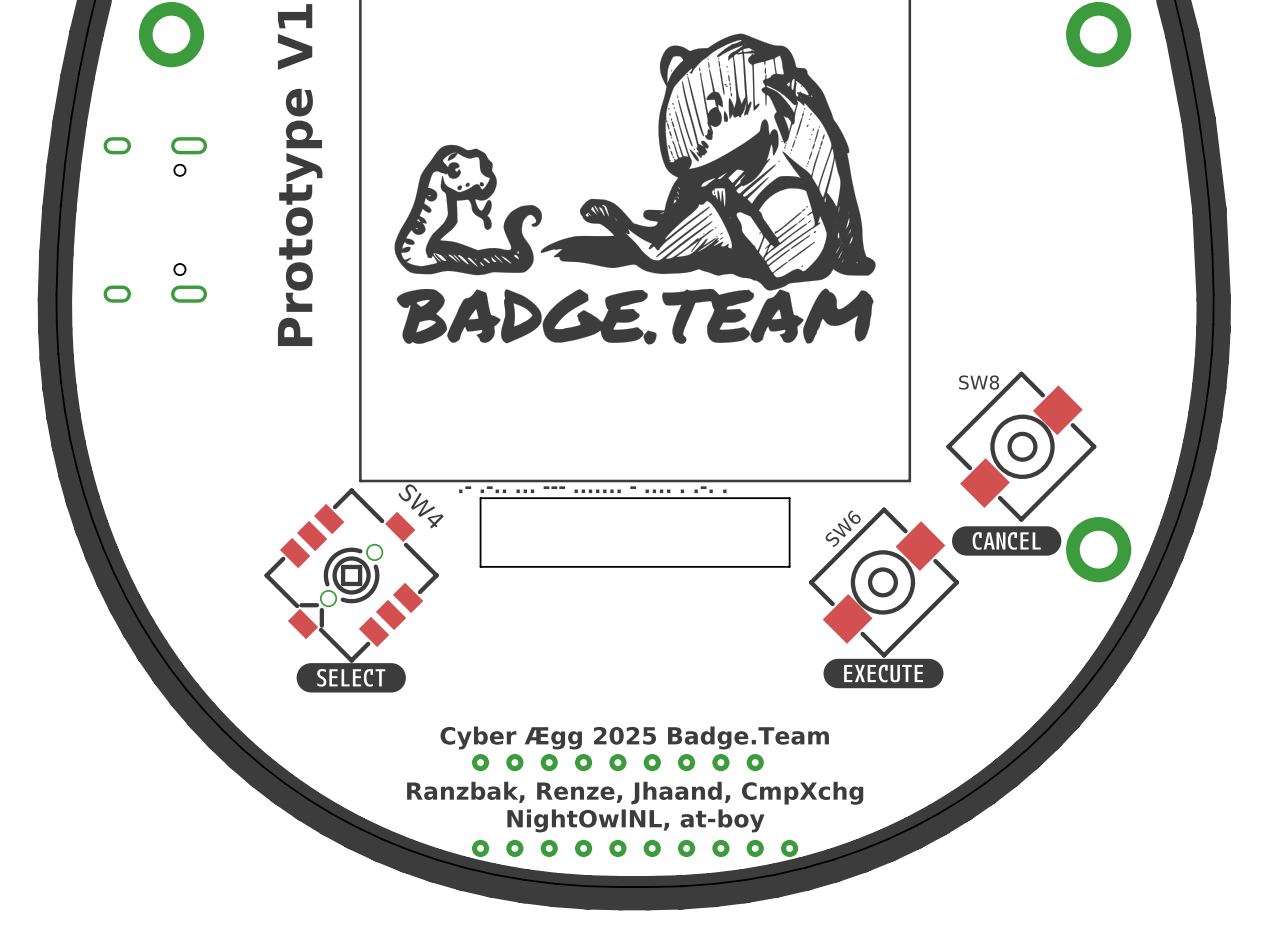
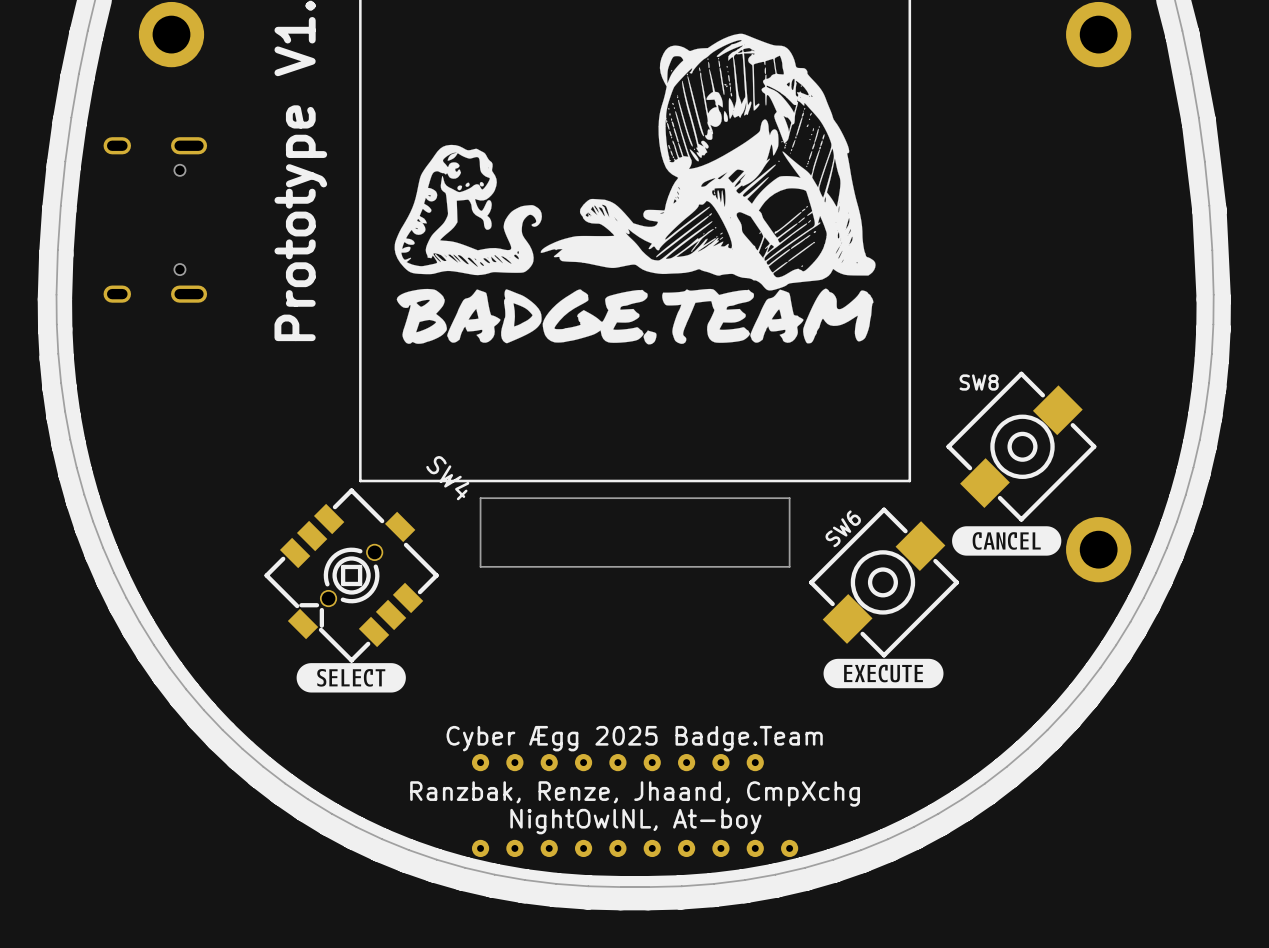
text: .- .-.. ... --- ....... - .... . .-. . (592, 489) -> none
SW4 name position: SW4 (421, 506) -> SW4 (447, 478)
text: NightOwlNL, at-boy (635, 820) -> NightOwlNL, At-boy (635, 821)

